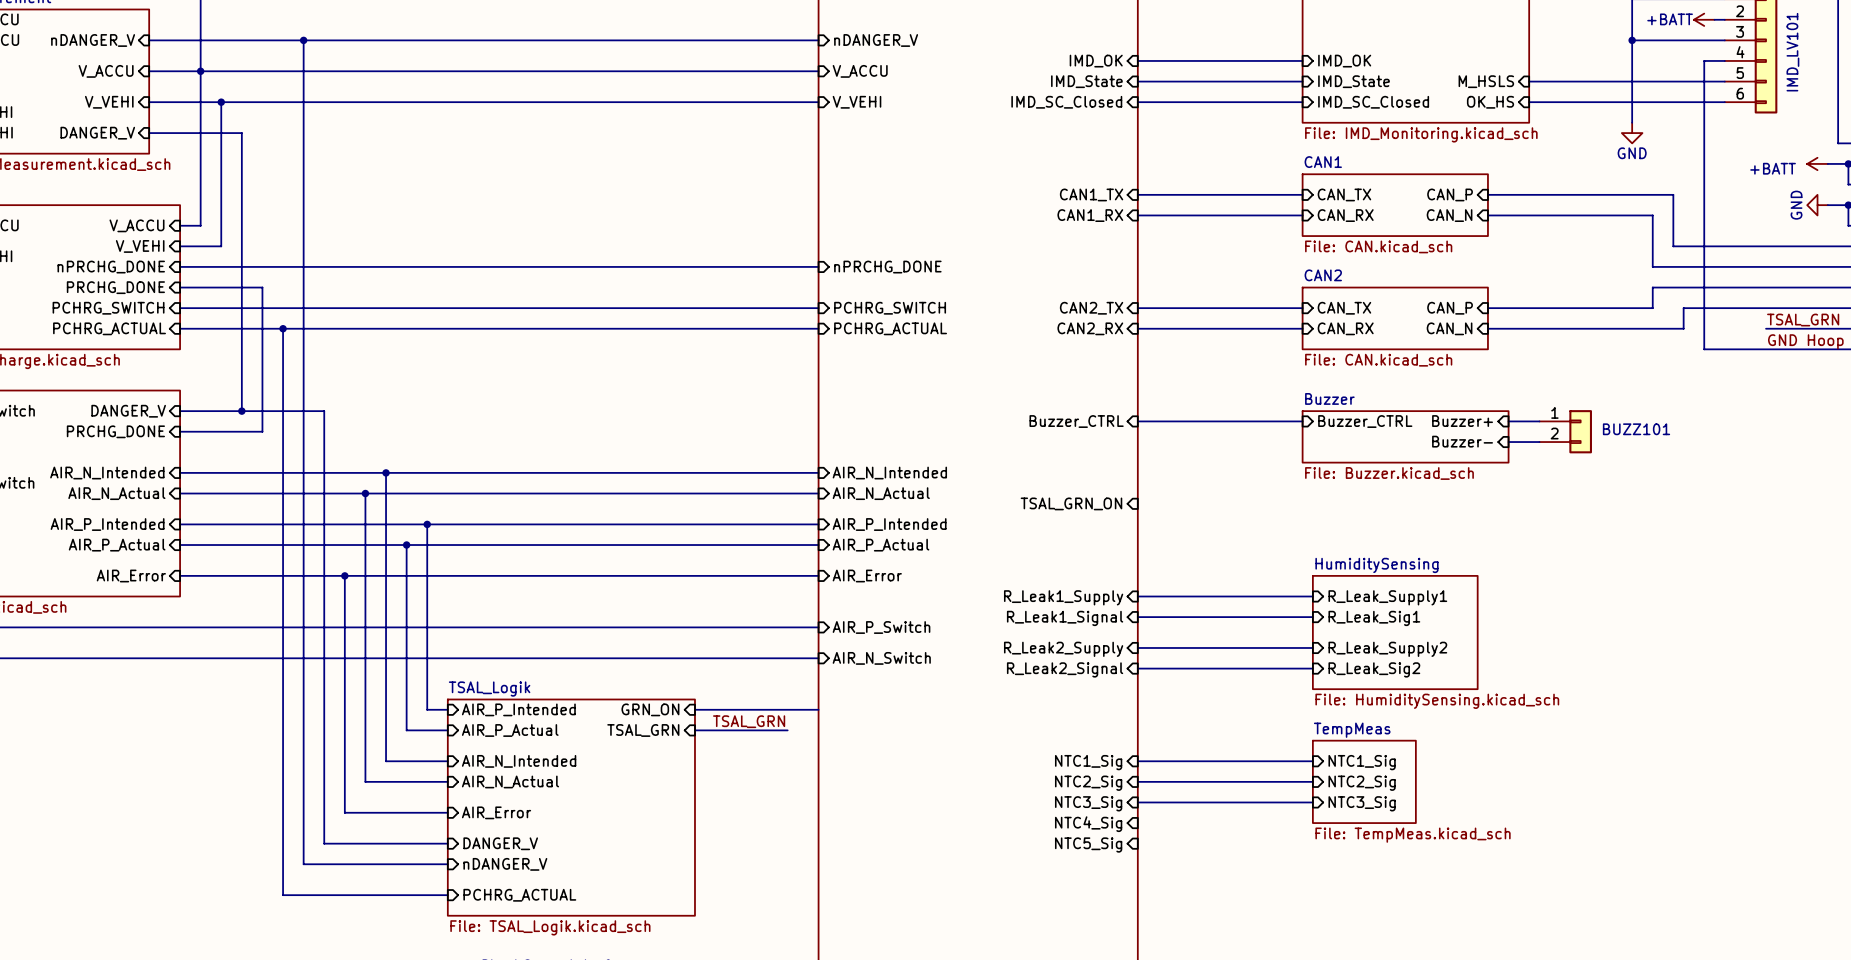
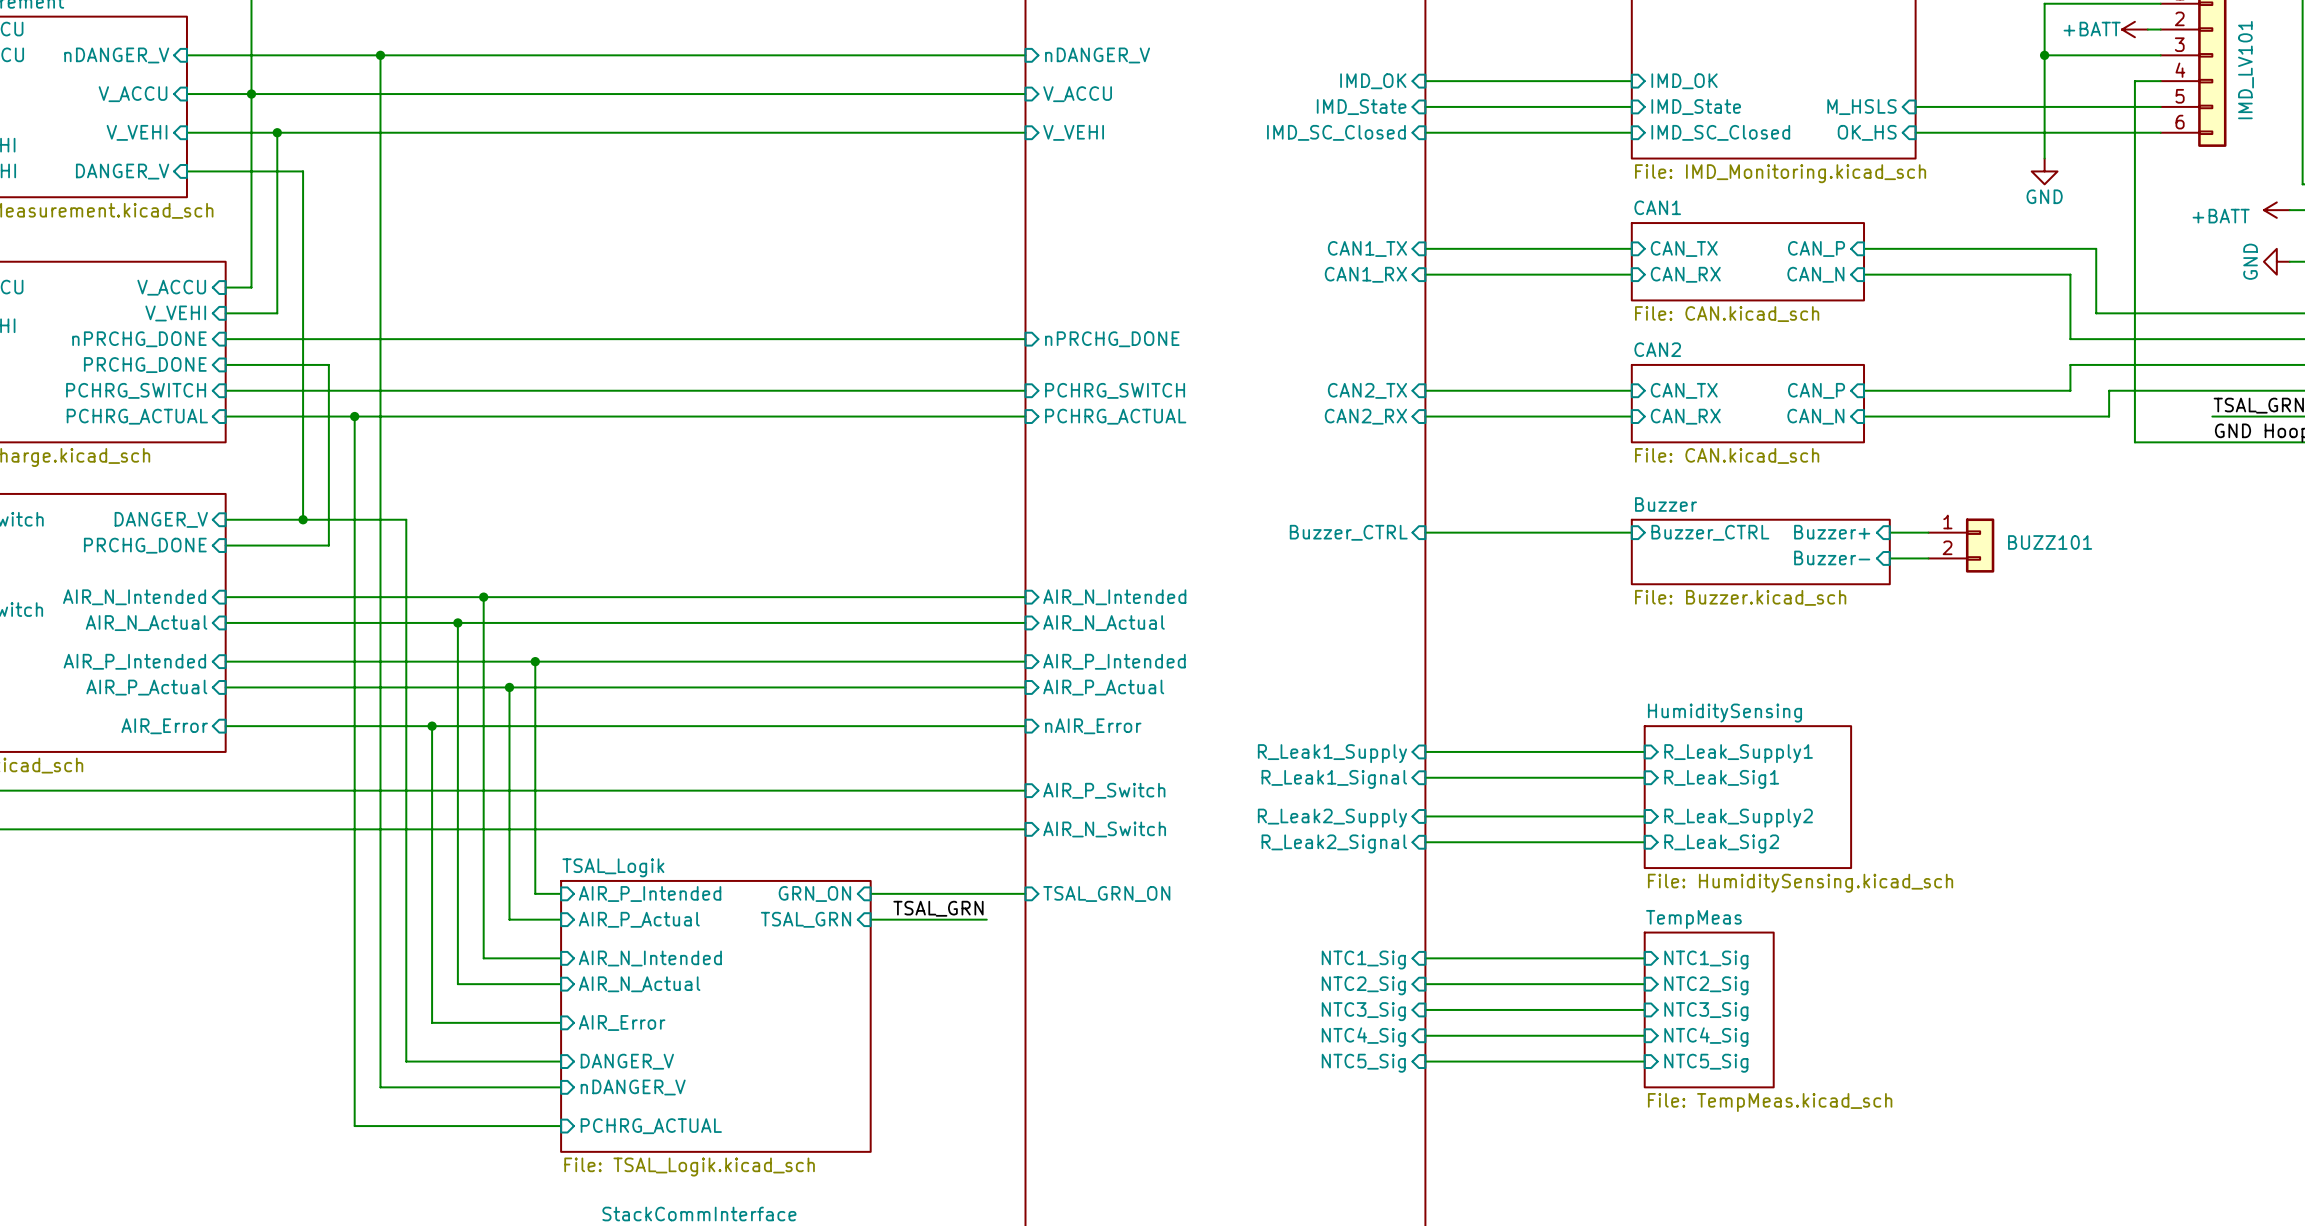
sheet pin: TSAL_GRN_ON (1071, 503) -> none
sheet pin: AIR_Error (867, 576) -> nAIR_Error (1093, 726)
sheet pin: none -> TSAL_GRN_ON (1106, 893)
sheet TempMeas: File: TempMeas.kicad_sch (1364, 781) -> none
sheet TempMeas: none -> File: TempMeas.kicad_sch (1709, 1009)
wire: none -> (1425, 1035) (1644, 1035)
sheet pin: none -> NTC4_Sig (1706, 1037)
wire: none -> (1425, 1061) (1644, 1061)
sheet pin: none -> NTC5_Sig (1706, 1063)

